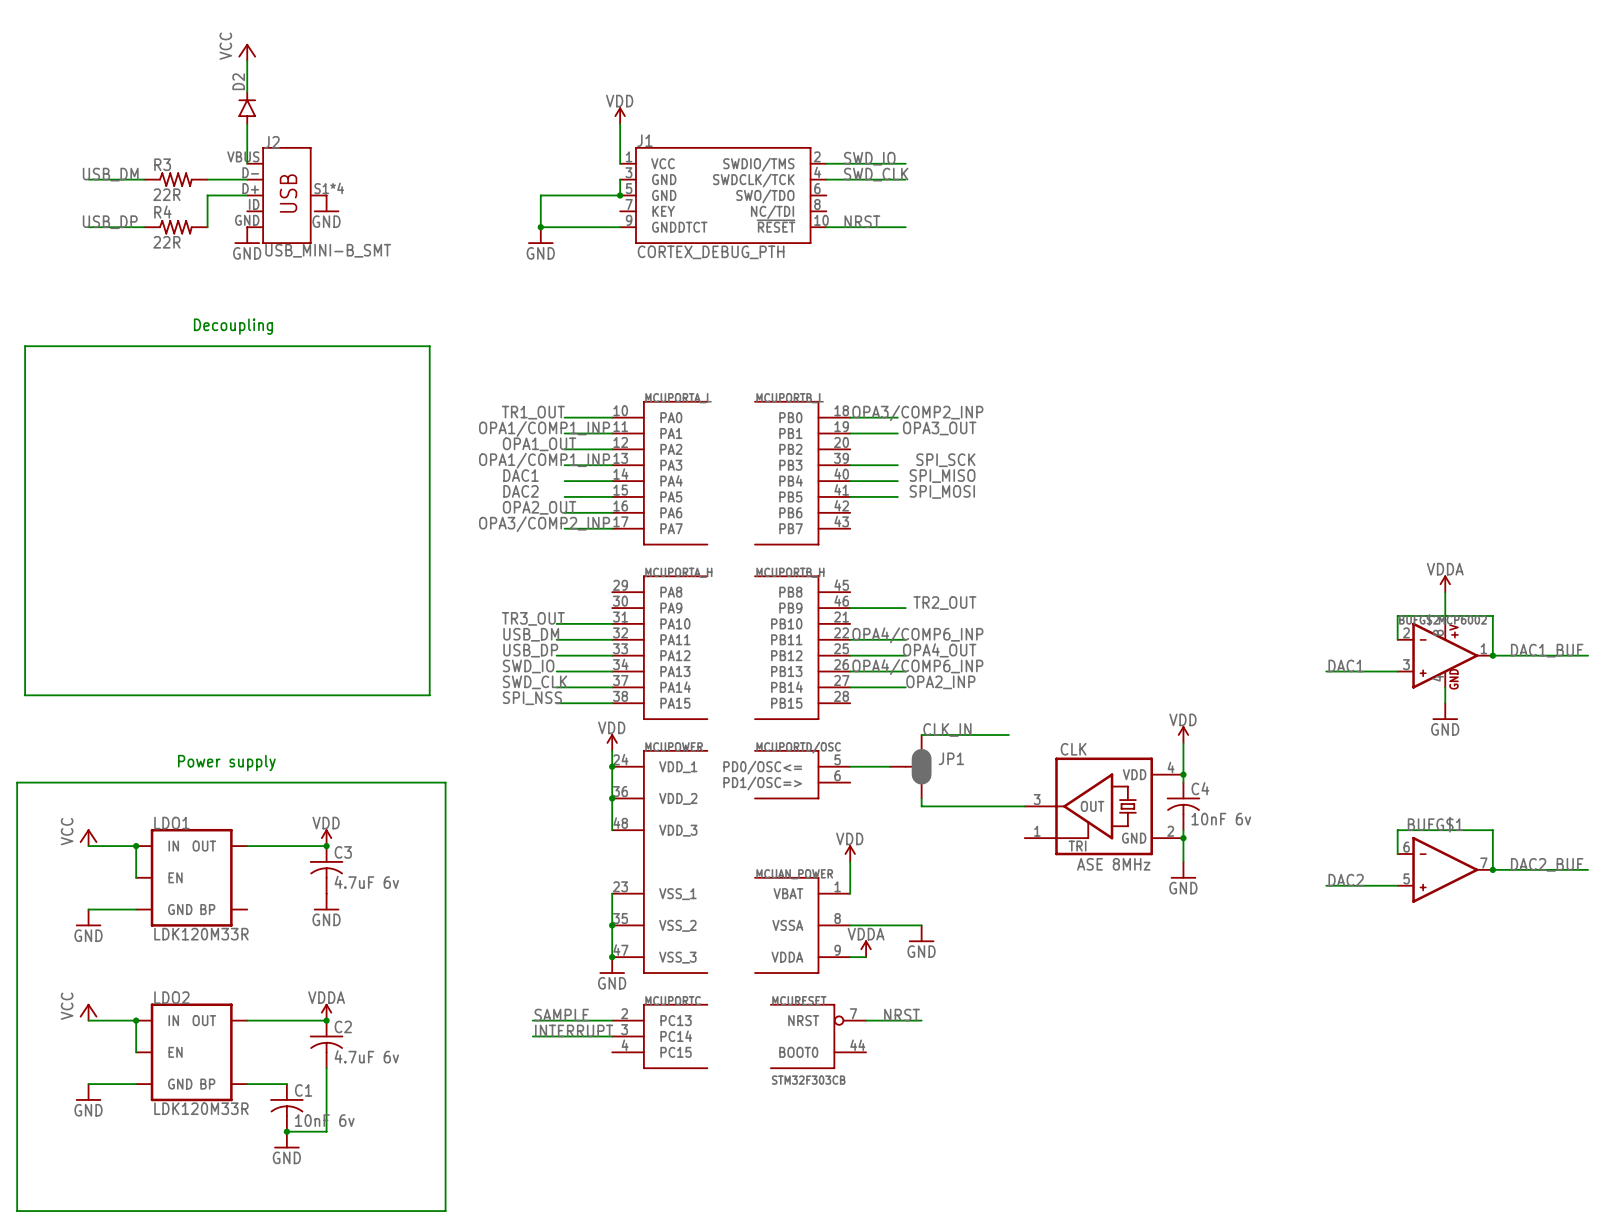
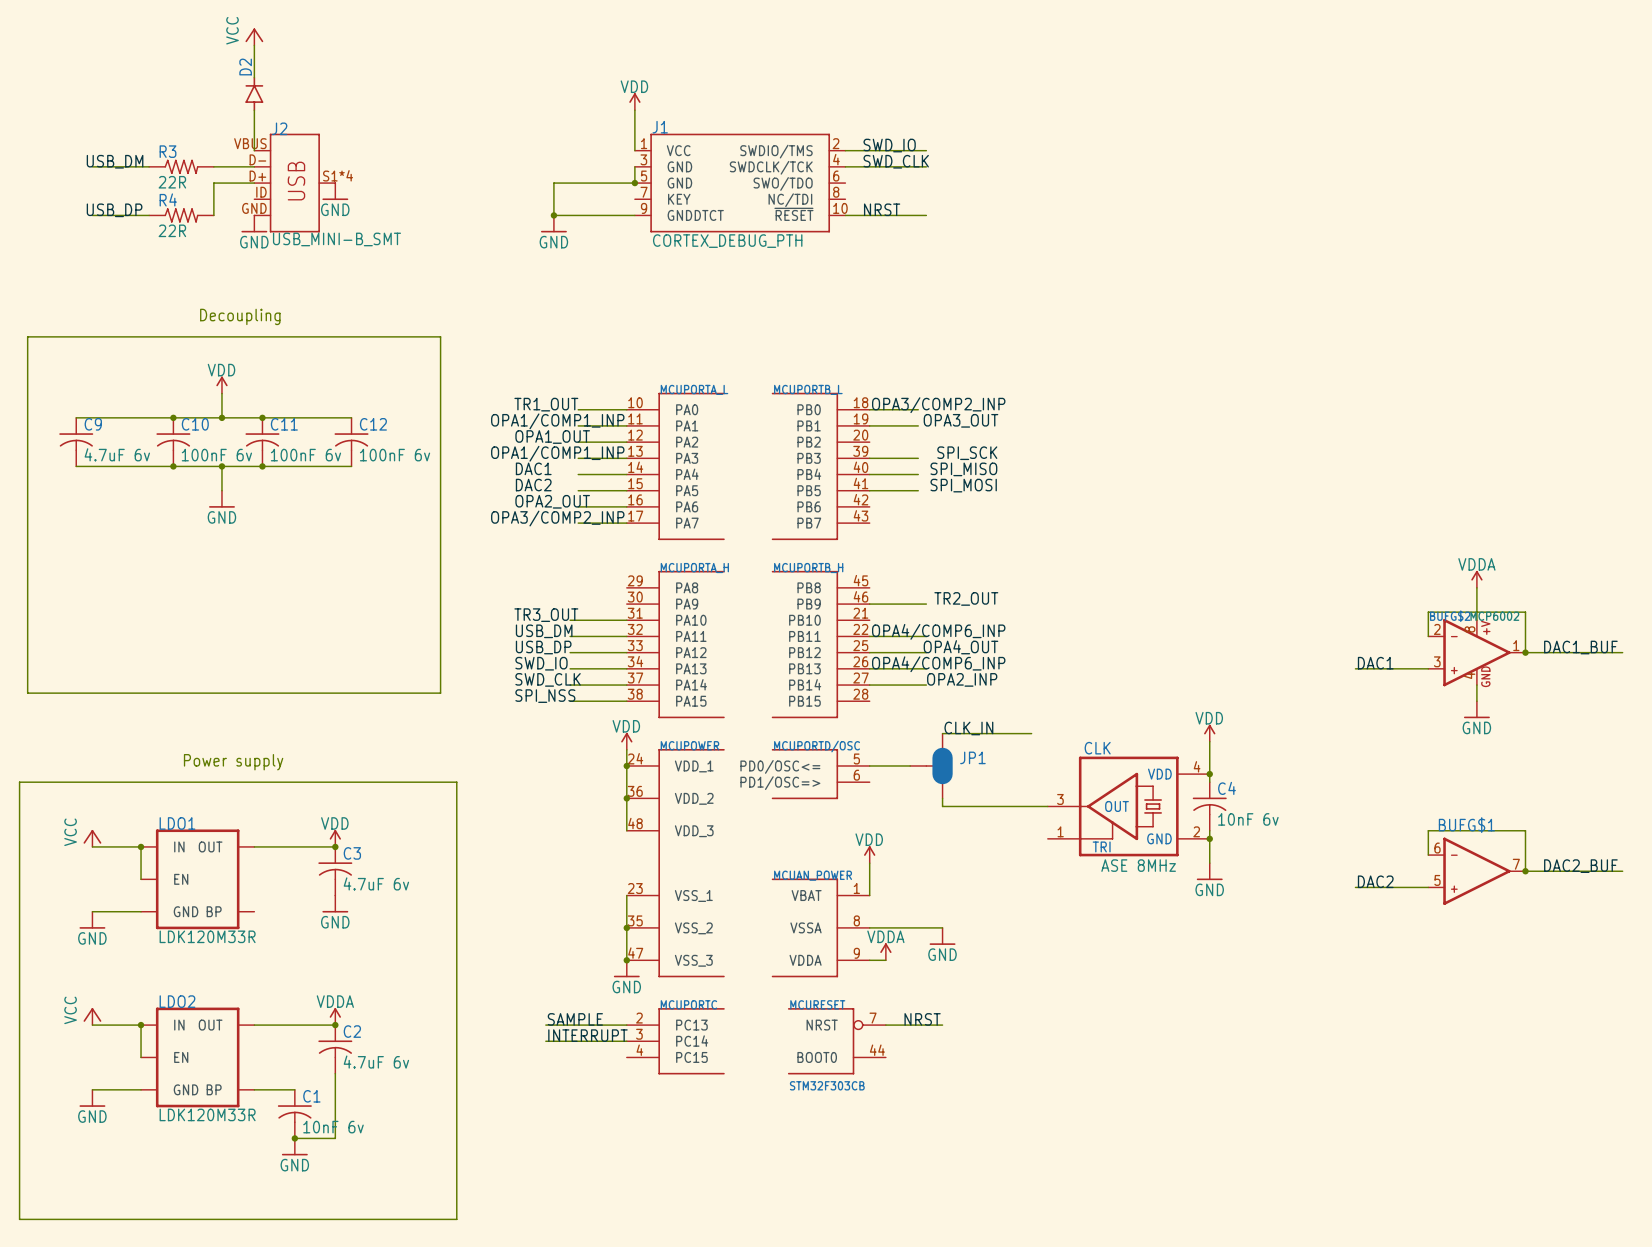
power symbol: none -> VDD (221, 385)
wire: none -> (221, 393) (221, 417)
wire: none -> (76, 417) (351, 417)
junction: none -> (173, 417)
junction: none -> (221, 417)
junction: none -> (262, 417)
C9: none -> 4.7uF 6v (76, 442)
C10: none -> 100nF 6v (173, 442)
C11: none -> 100nF 6v (262, 442)
C12: none -> 100nF 6v (351, 442)
wire: none -> (76, 466) (351, 466)
junction: none -> (173, 466)
wire: none -> (221, 466) (221, 490)
junction: none -> (221, 466)
junction: none -> (262, 466)
power symbol: none -> GND (221, 499)

